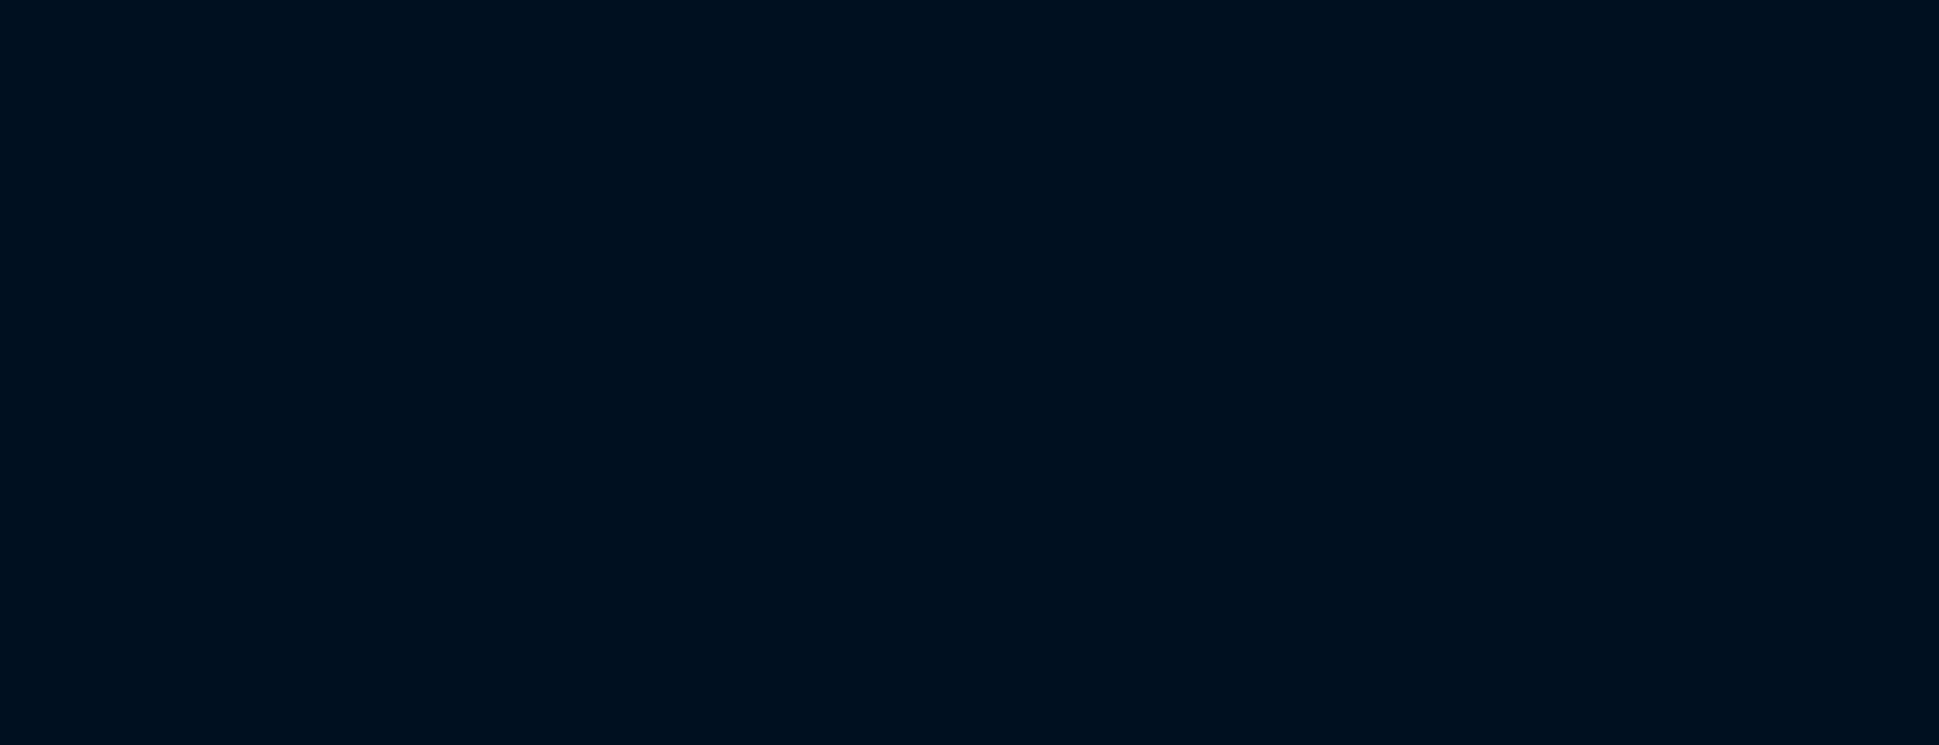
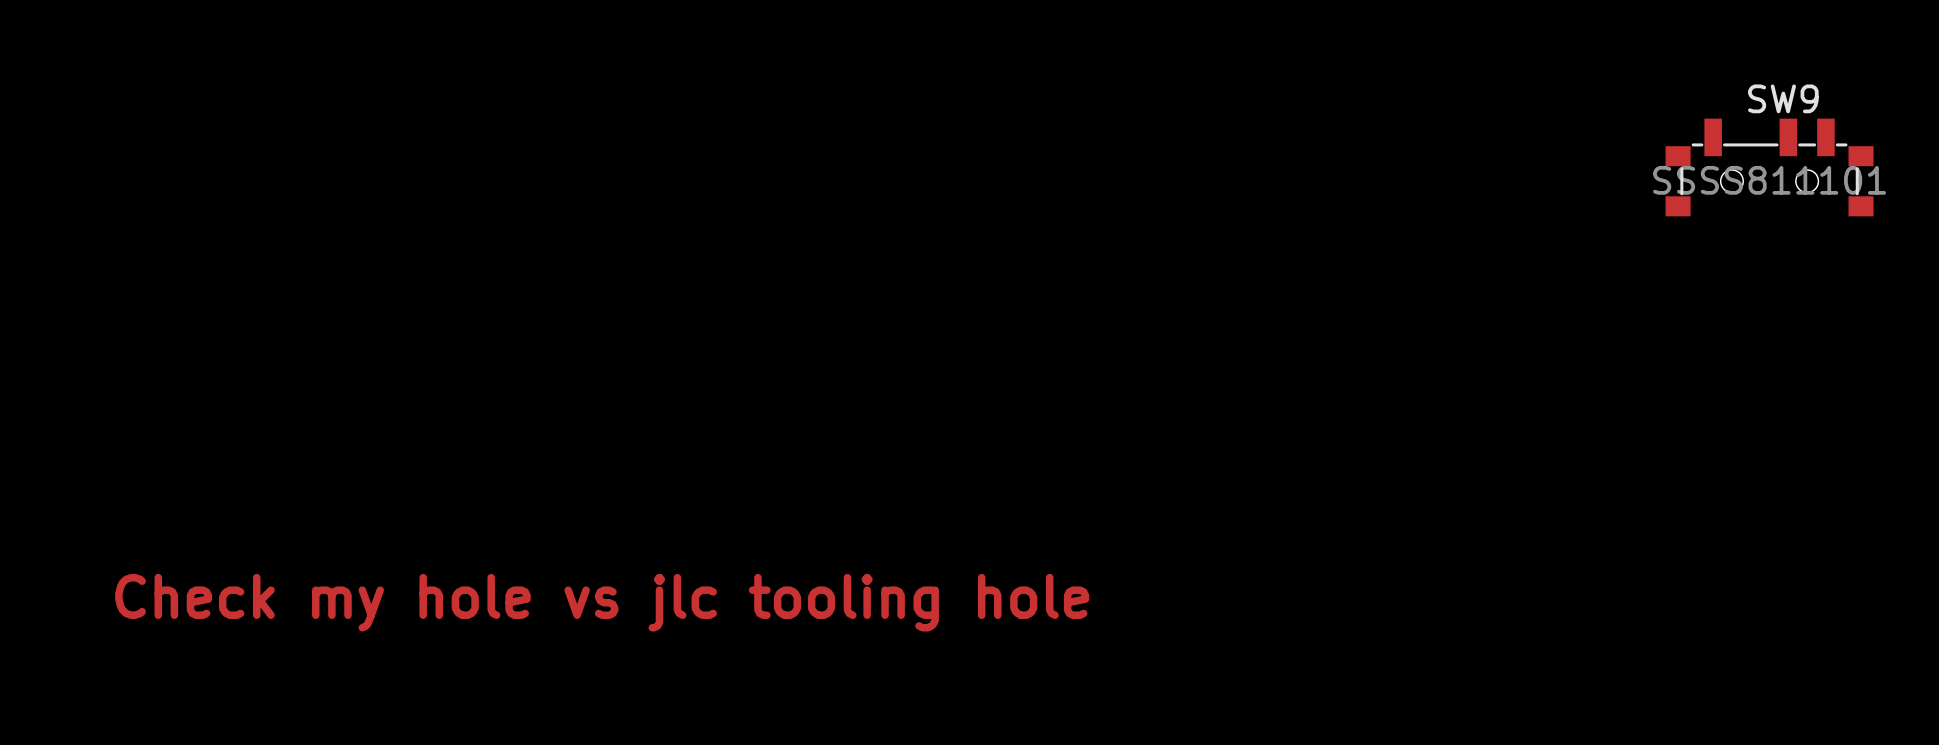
SW9: none -> SSSS811101 (1769, 167)
text: none -> Check my hole vs jlc tooling hole (602, 602)

